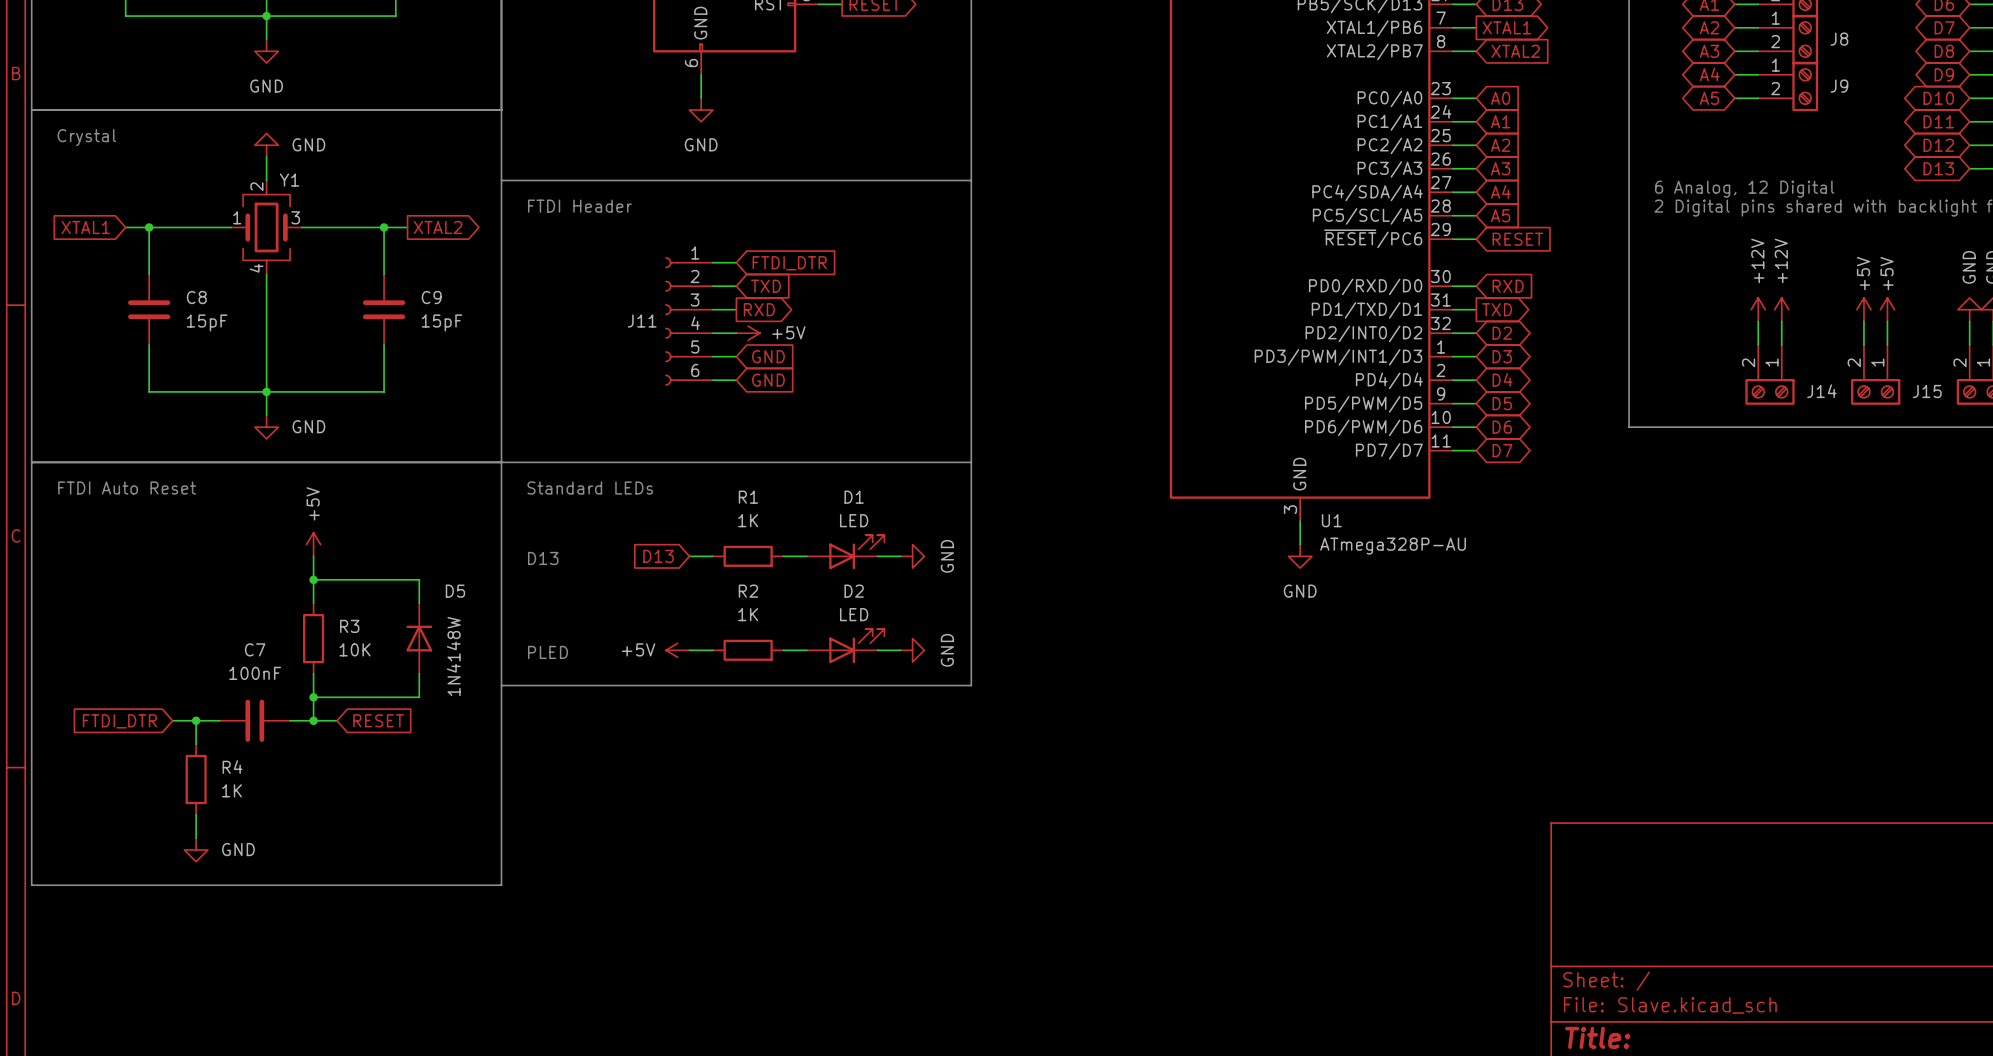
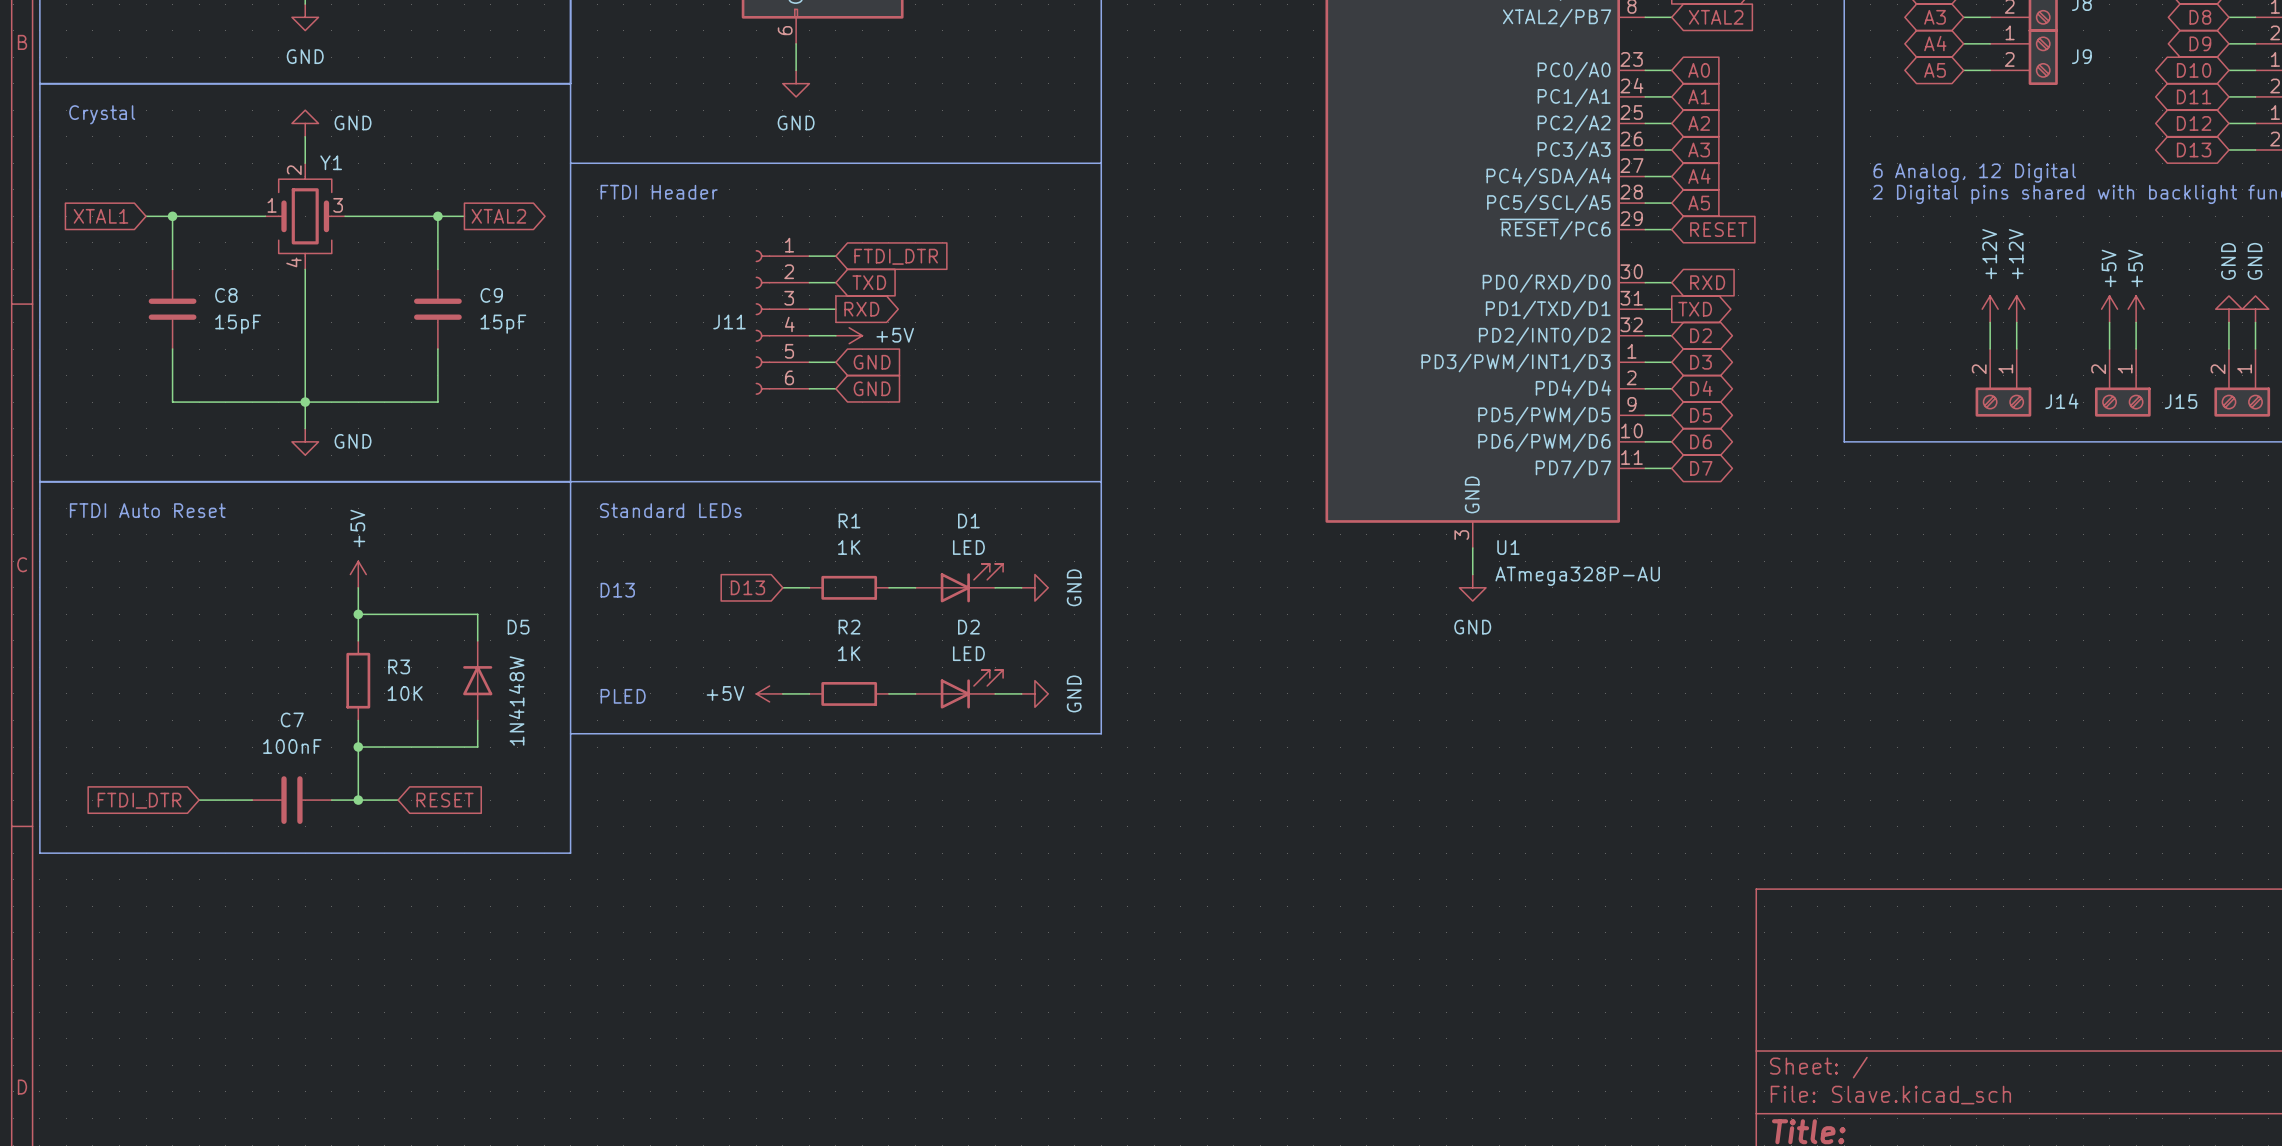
wire: (172, 720) (219, 720) -> (199, 800) (252, 800)
wire: (196, 720) (196, 744) -> (358, 773) (358, 800)
junction: (196, 720) -> none
C7 position: (254, 720) -> (291, 800)
wire: (290, 720) (337, 720) -> none
junction position: (313, 720) -> (358, 800)
global label position: RESET (378, 720) -> RESET (445, 800)
global label position: FTDI_DTR (119, 721) -> FTDI_DTR (139, 800)
wire: none -> (331, 800) (398, 800)
R4: 1K (196, 779) -> none
line: (31, 791) (31, 885) (501, 885) (501, 791) -> (39, 853) (570, 853)
wire: (196, 814) (196, 838) -> none
power symbol: GND (196, 849) -> none

